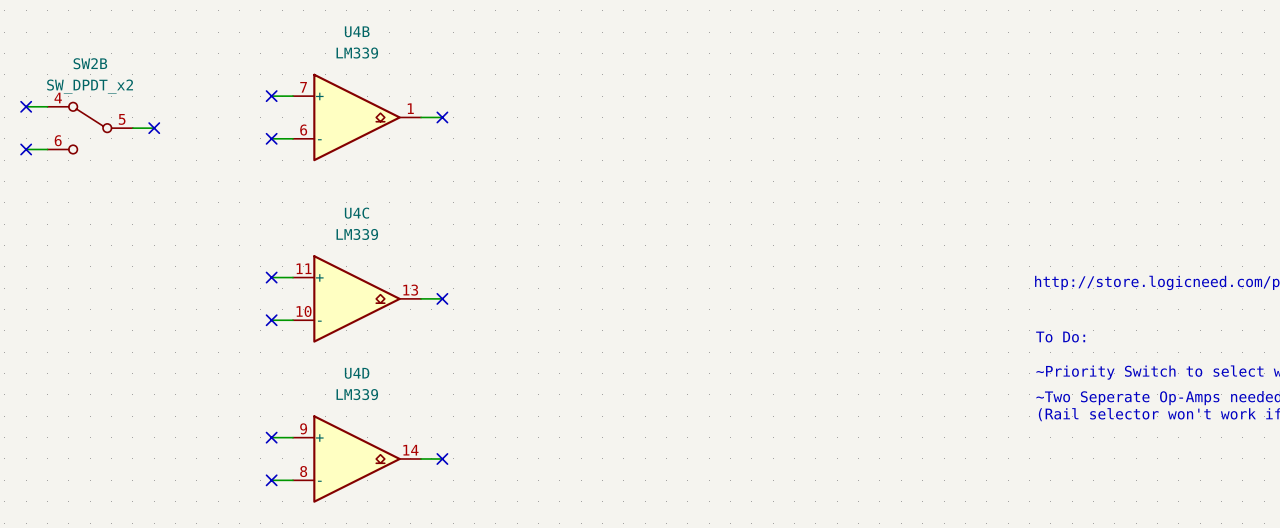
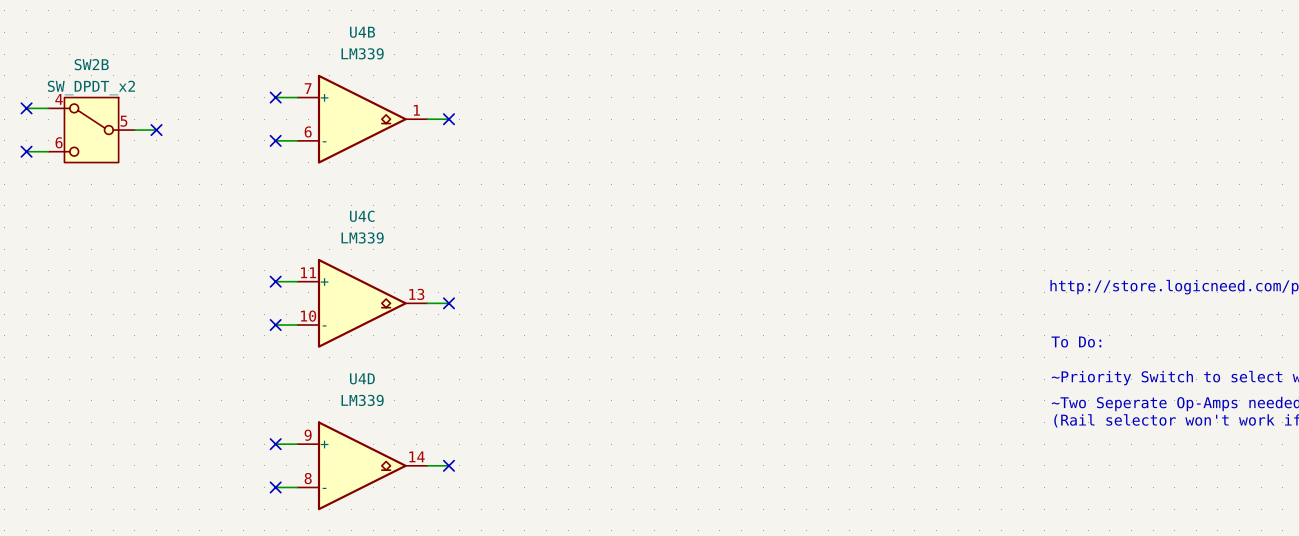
SW2B symbol: [47, 102, 133, 154] -> [48, 97, 135, 163]

